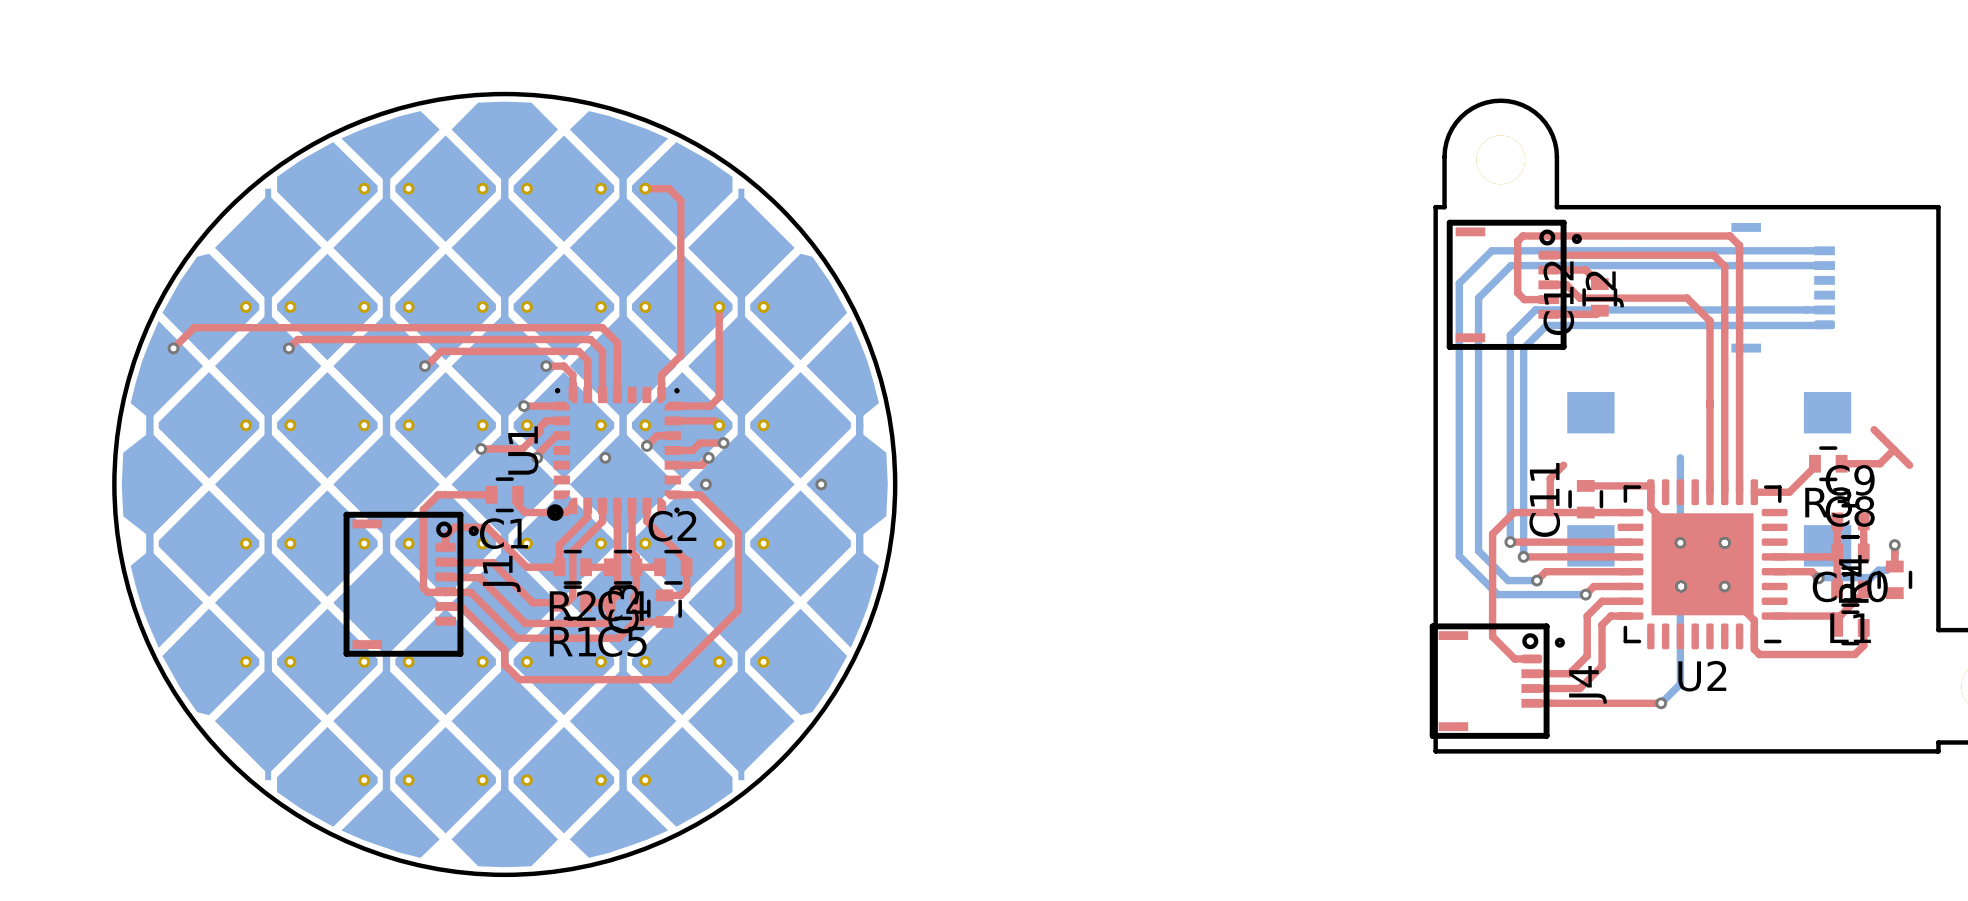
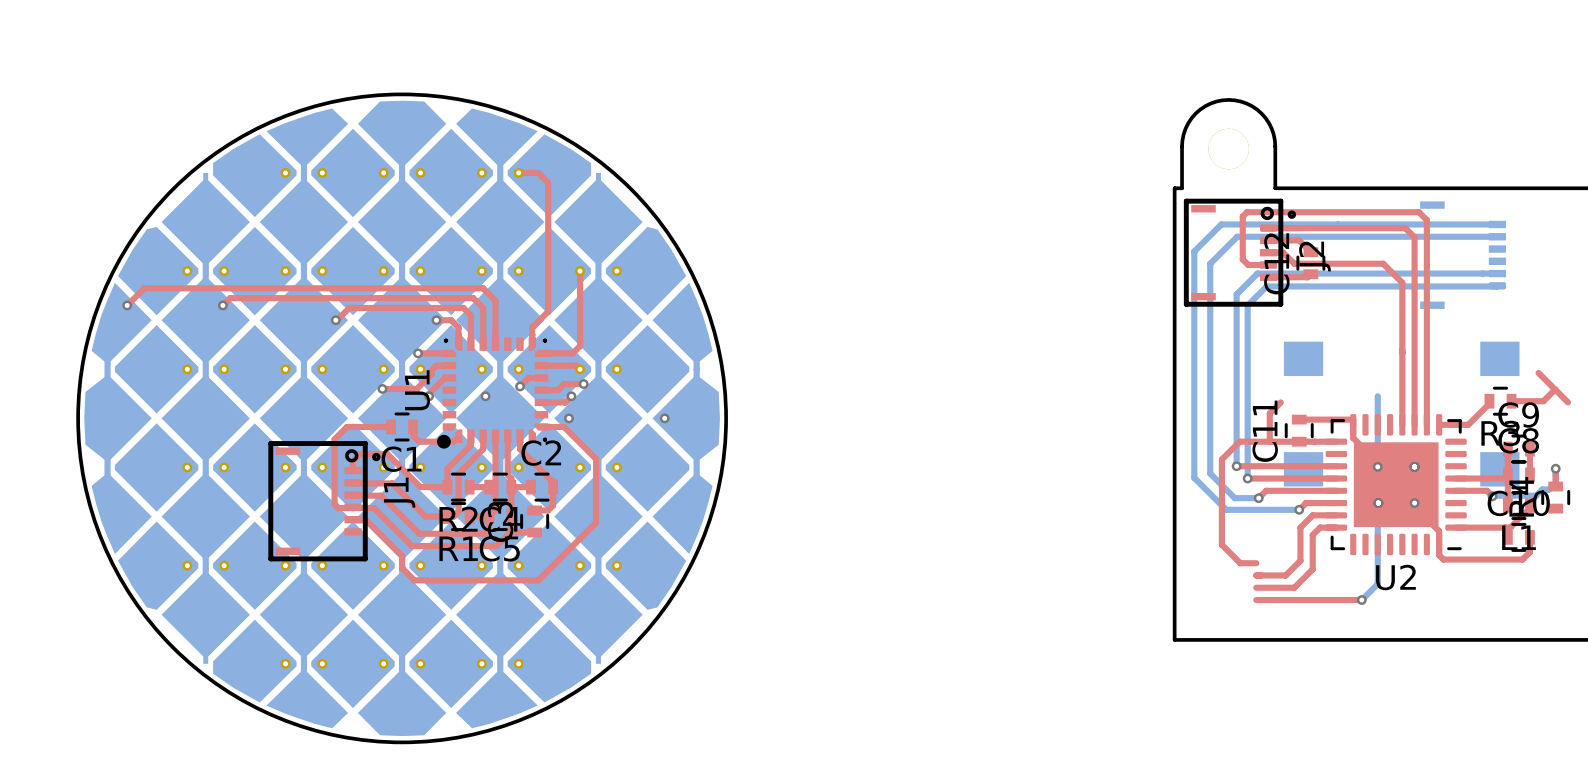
J4: (1497, 681) -> none

